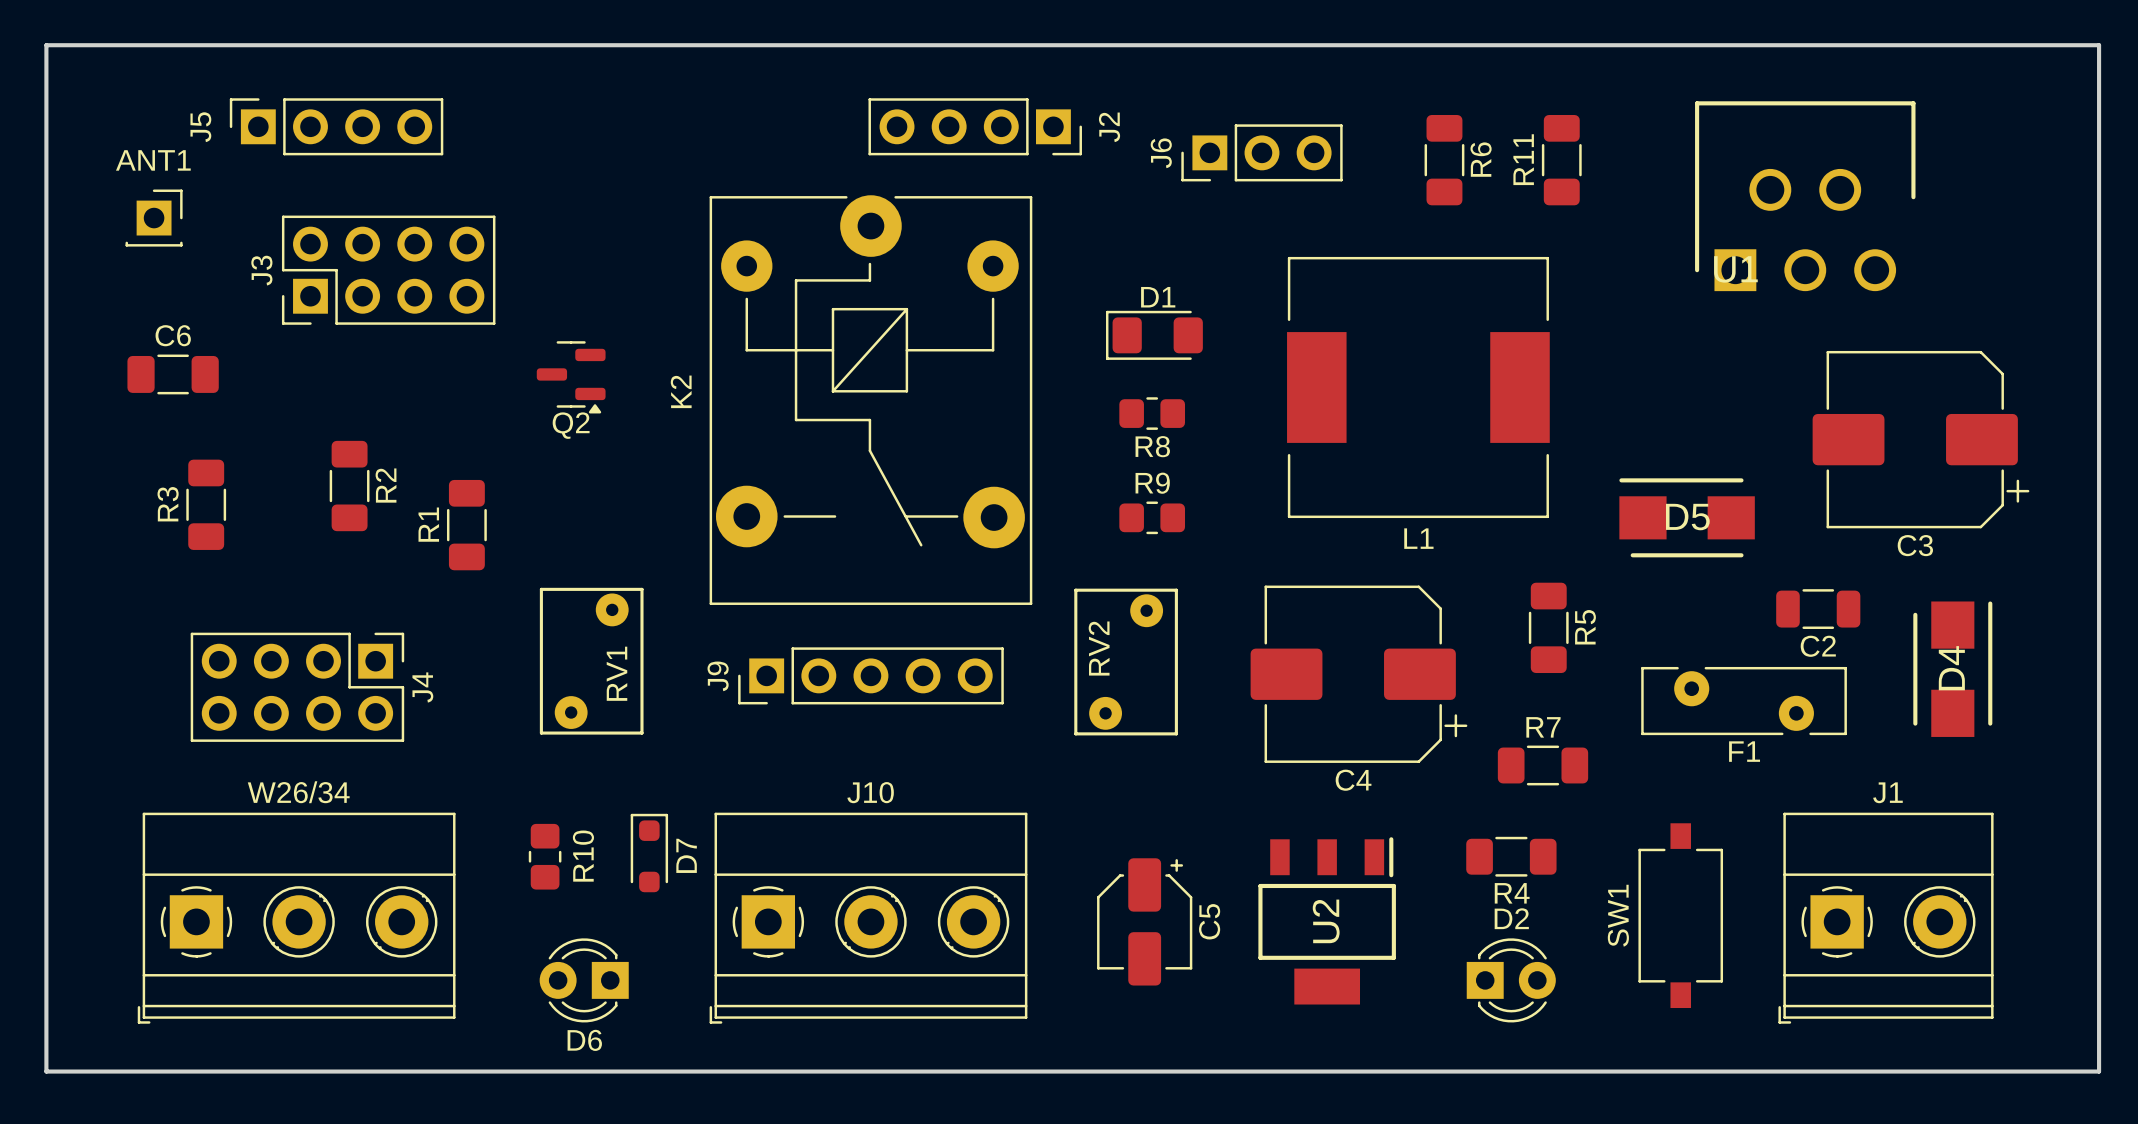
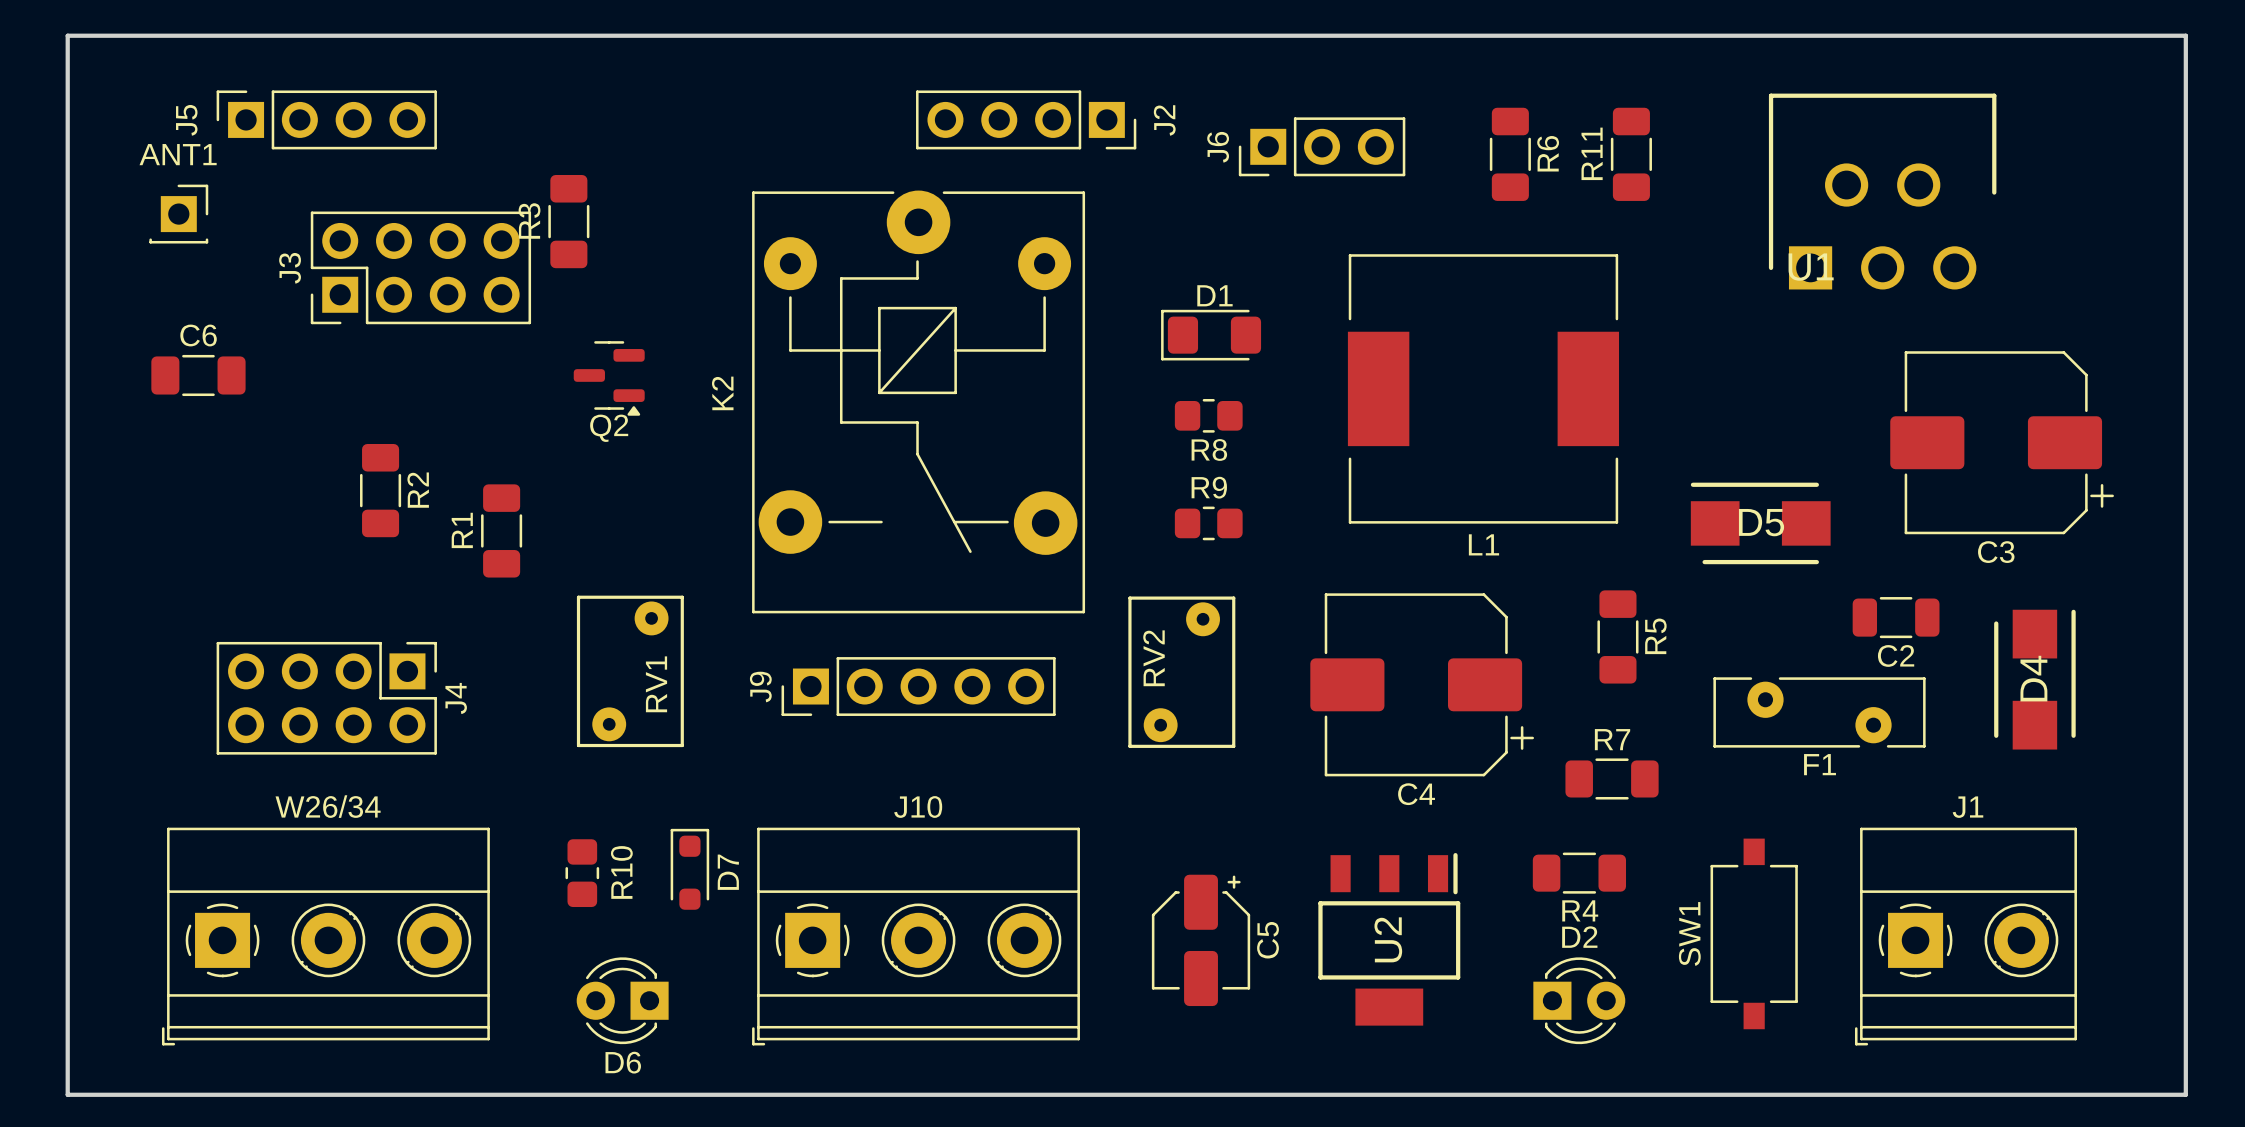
J5 position: (336, 126) -> (326, 119)
R3 position: (206, 504) -> (568, 221)

